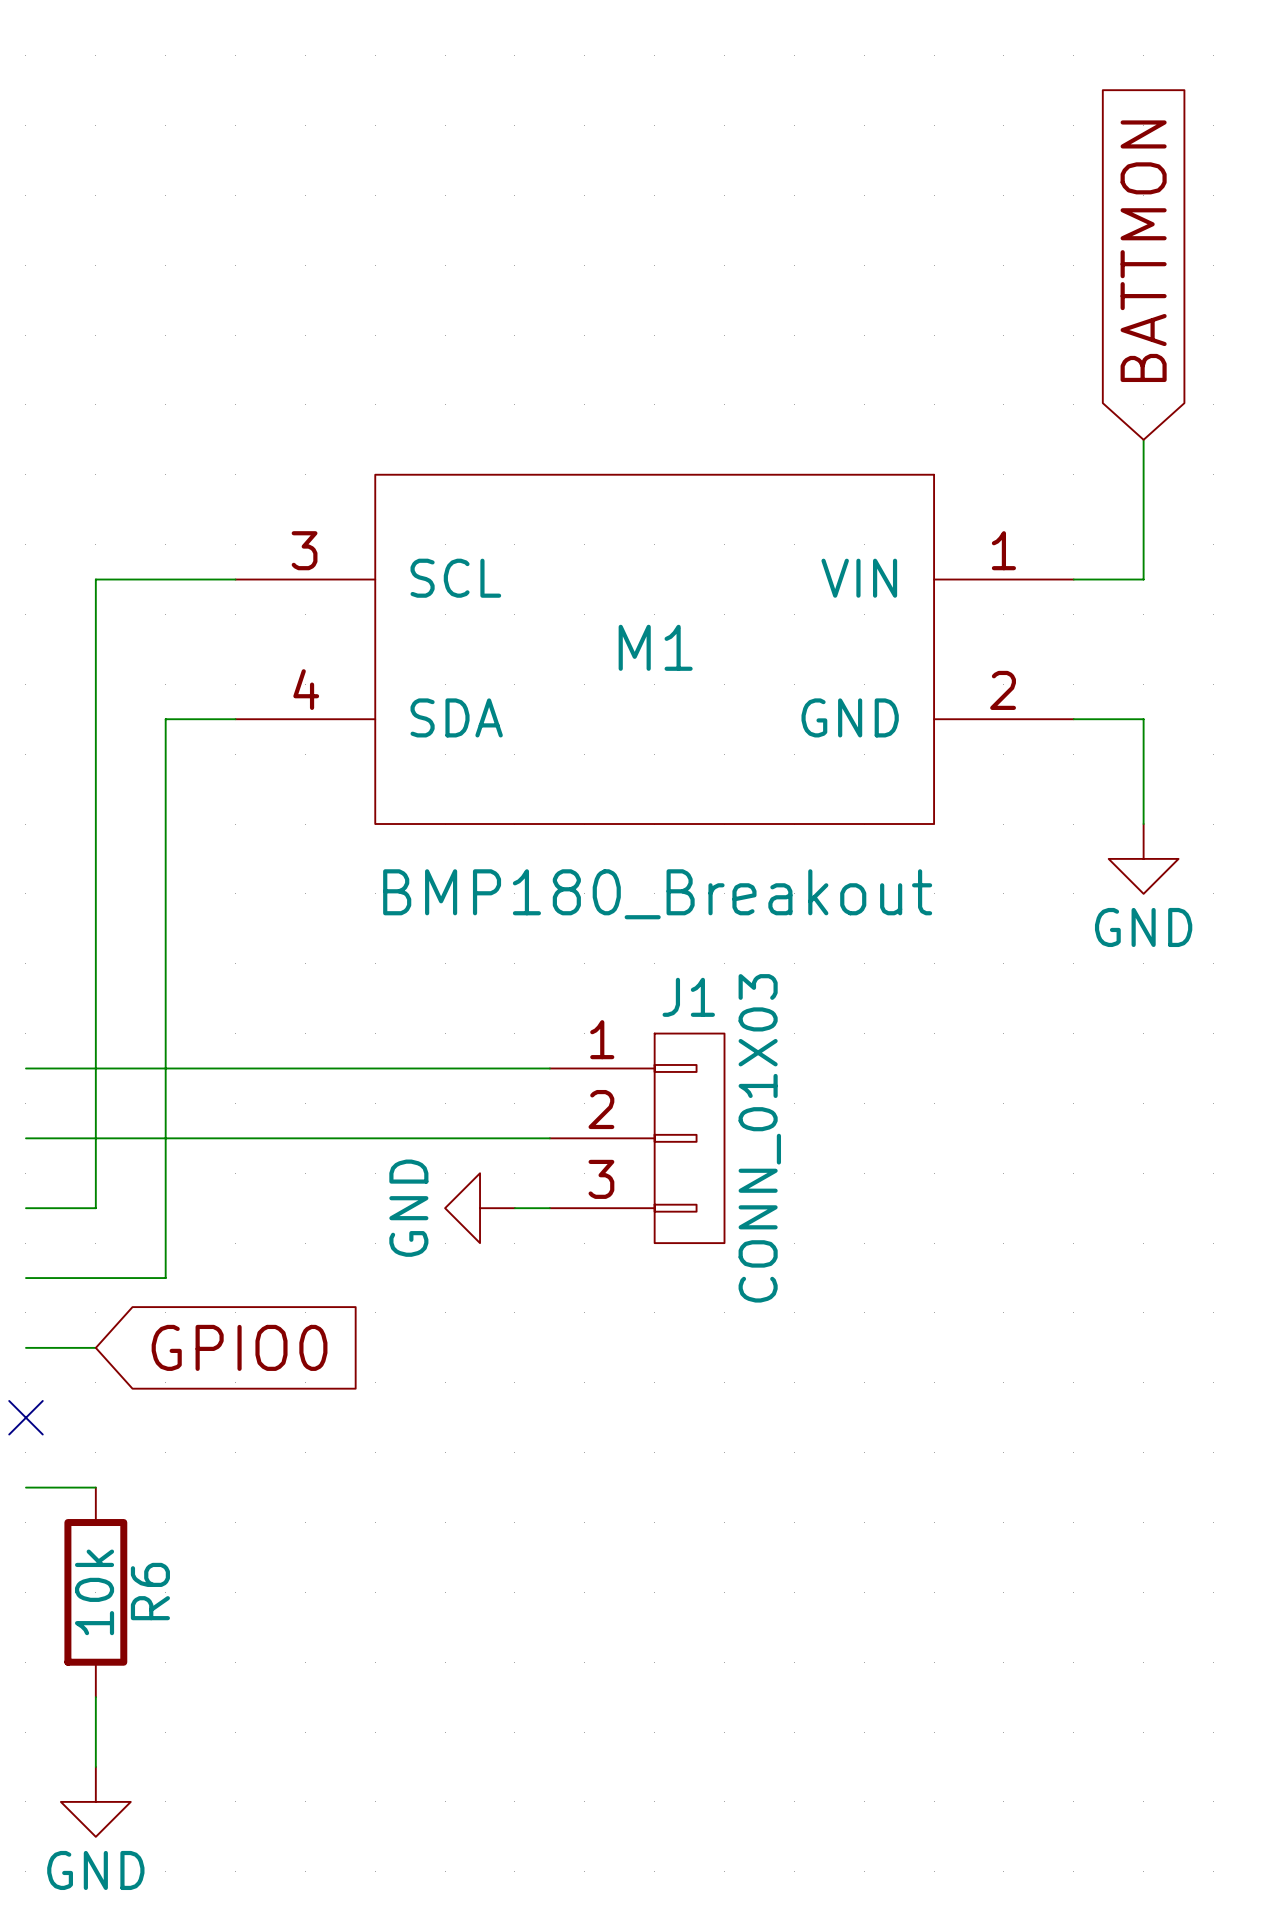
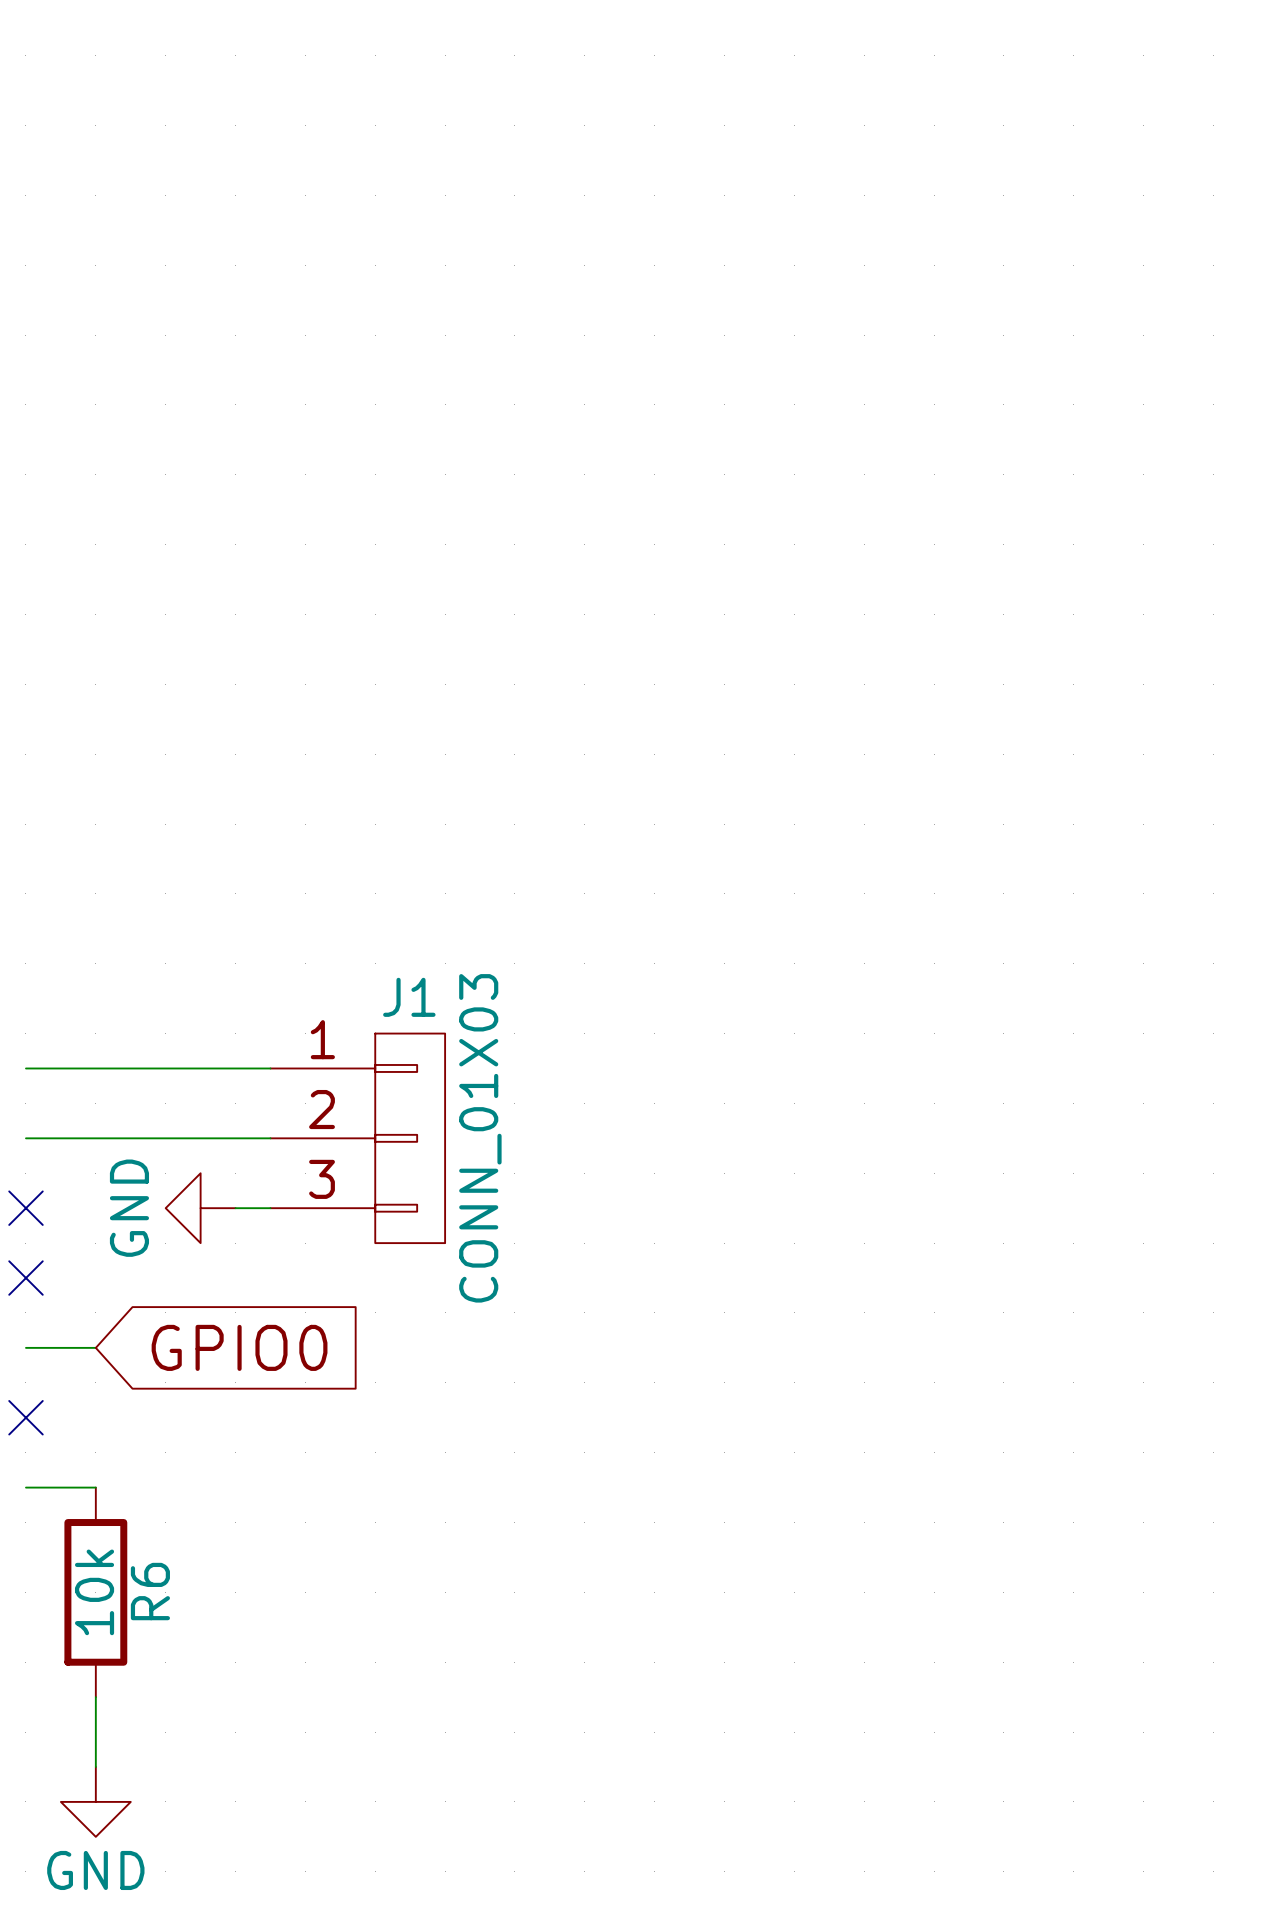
global label: BATTMON (1143, 251) -> none
wire: (1143, 439) (1143, 579) (1073, 579) -> none
wire: (235, 579) (95, 579) (95, 1208) (25, 1208) -> none
M1: BMP180_Breakout (654, 649) -> none
wire: (235, 719) (165, 719) (165, 1278) (25, 1278) -> none
wire: (1073, 719) (1143, 719) (1143, 824) -> none
power symbol: GND (1143, 858) -> none
wire: (270, 1068) (549, 1068) -> none
wire: (270, 1138) (549, 1138) -> none
J1 position: (637, 1138) -> (357, 1138)
no-connect mark: none -> (25, 1208)
power symbol position: GND (480, 1208) -> GND (200, 1208)
wire: (514, 1208) (549, 1208) -> (235, 1208) (270, 1208)
no-connect mark: none -> (25, 1278)

